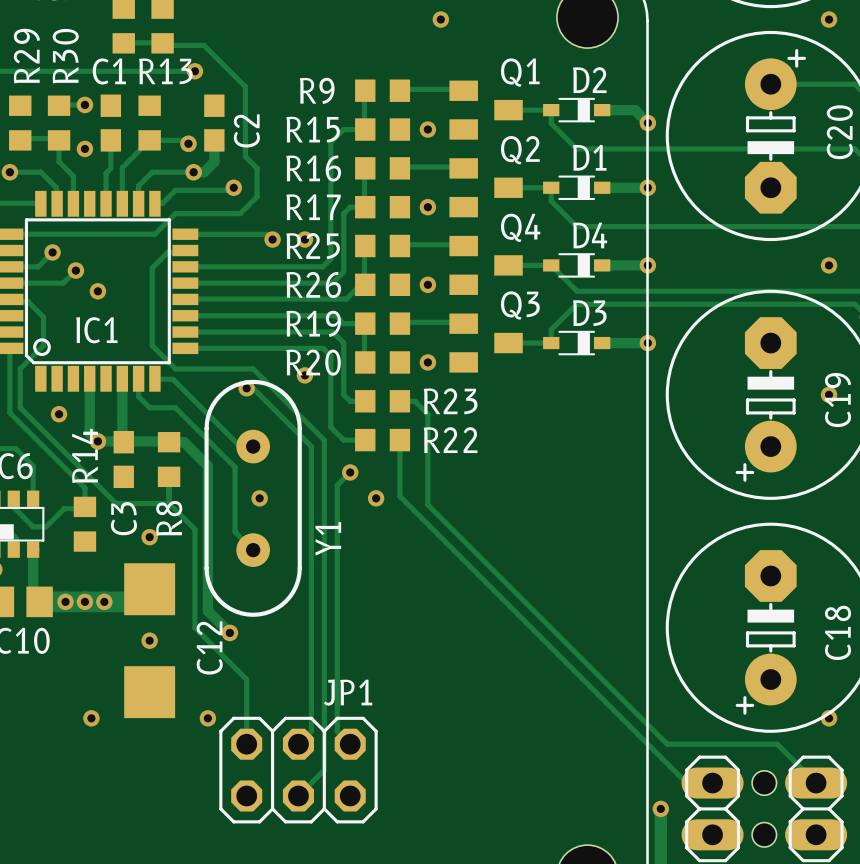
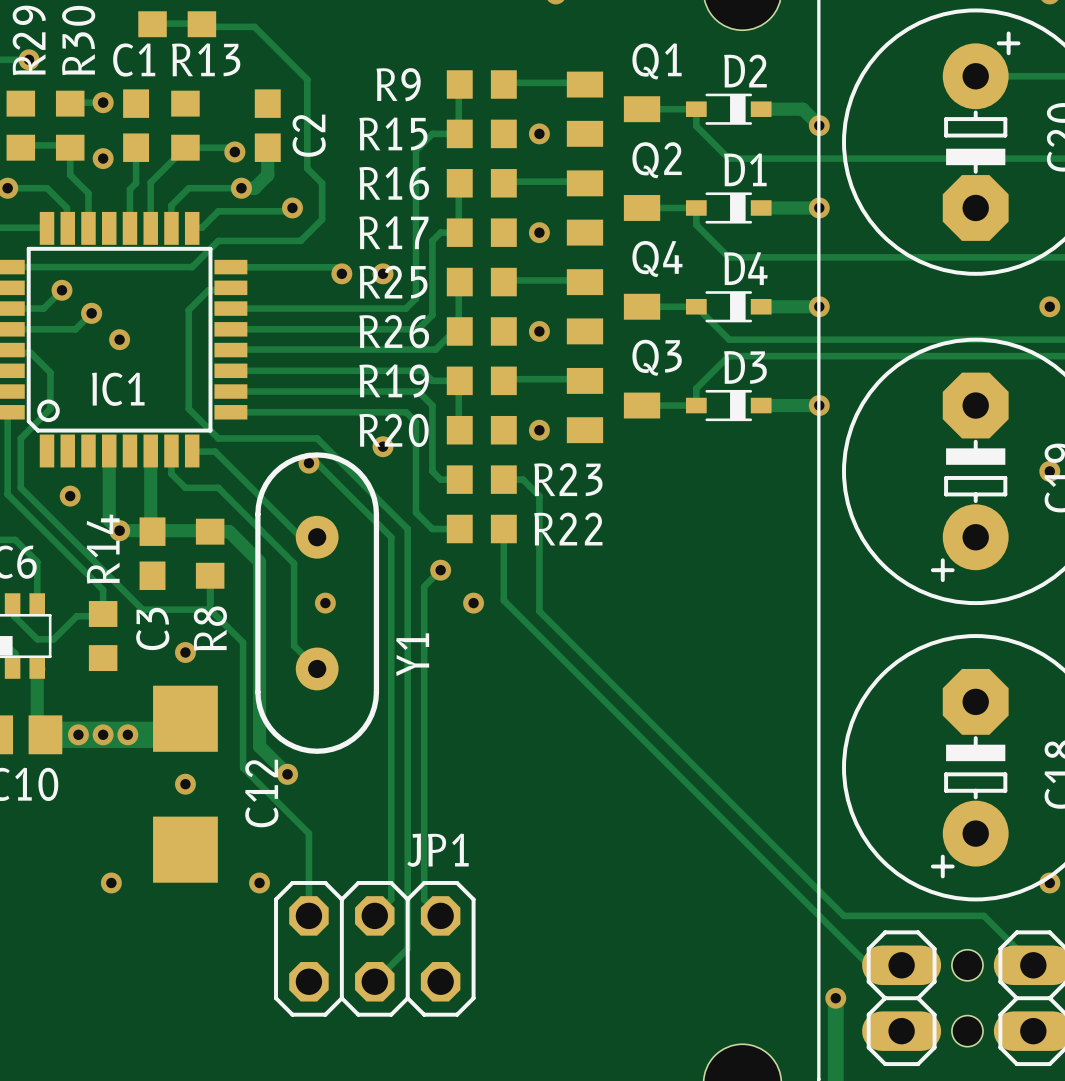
track: (26, 71) (194, 71) -> none
via: none -> (29, 59)
via: (194, 71) -> none

